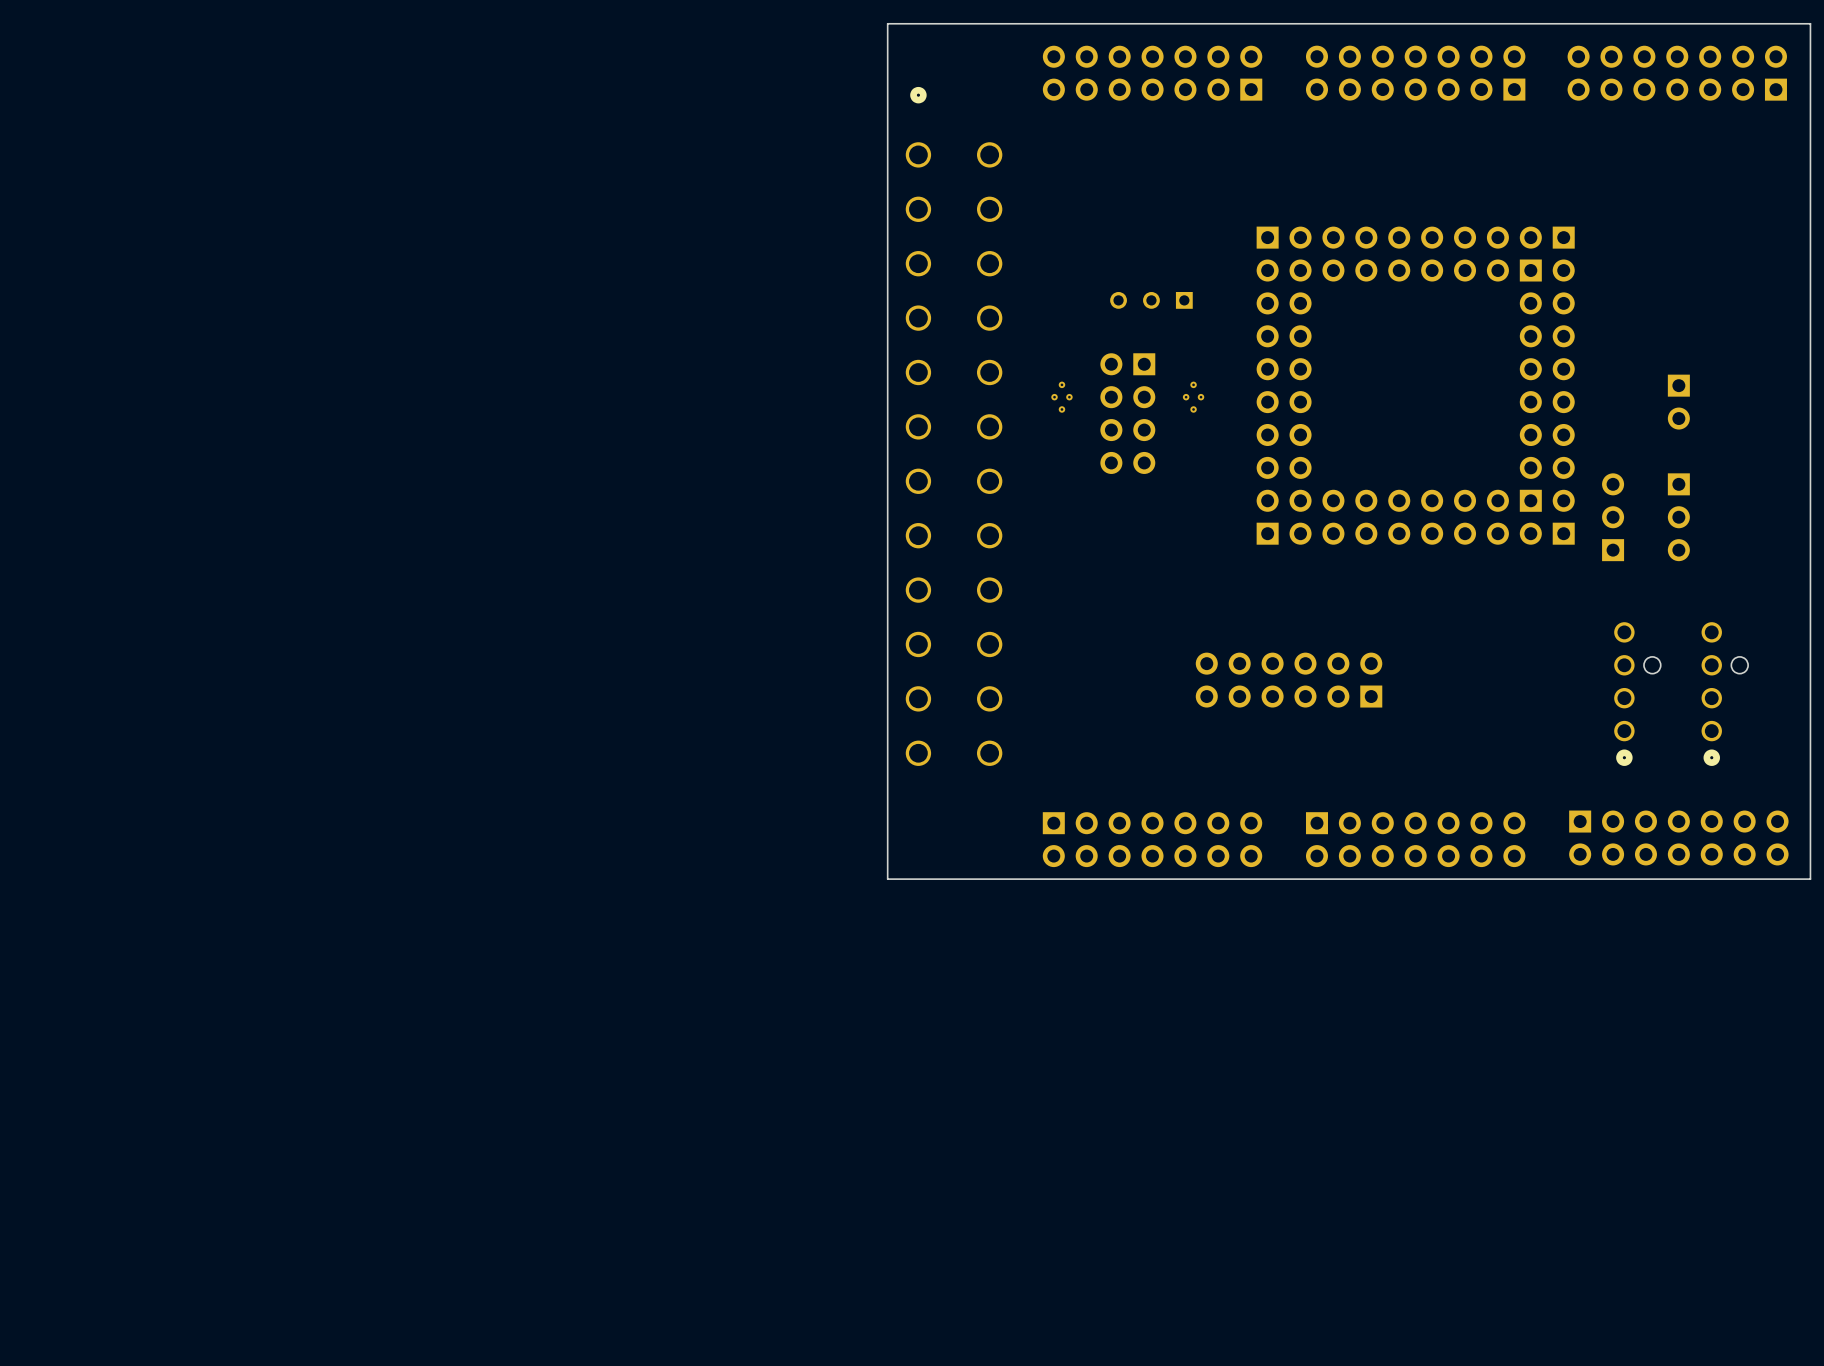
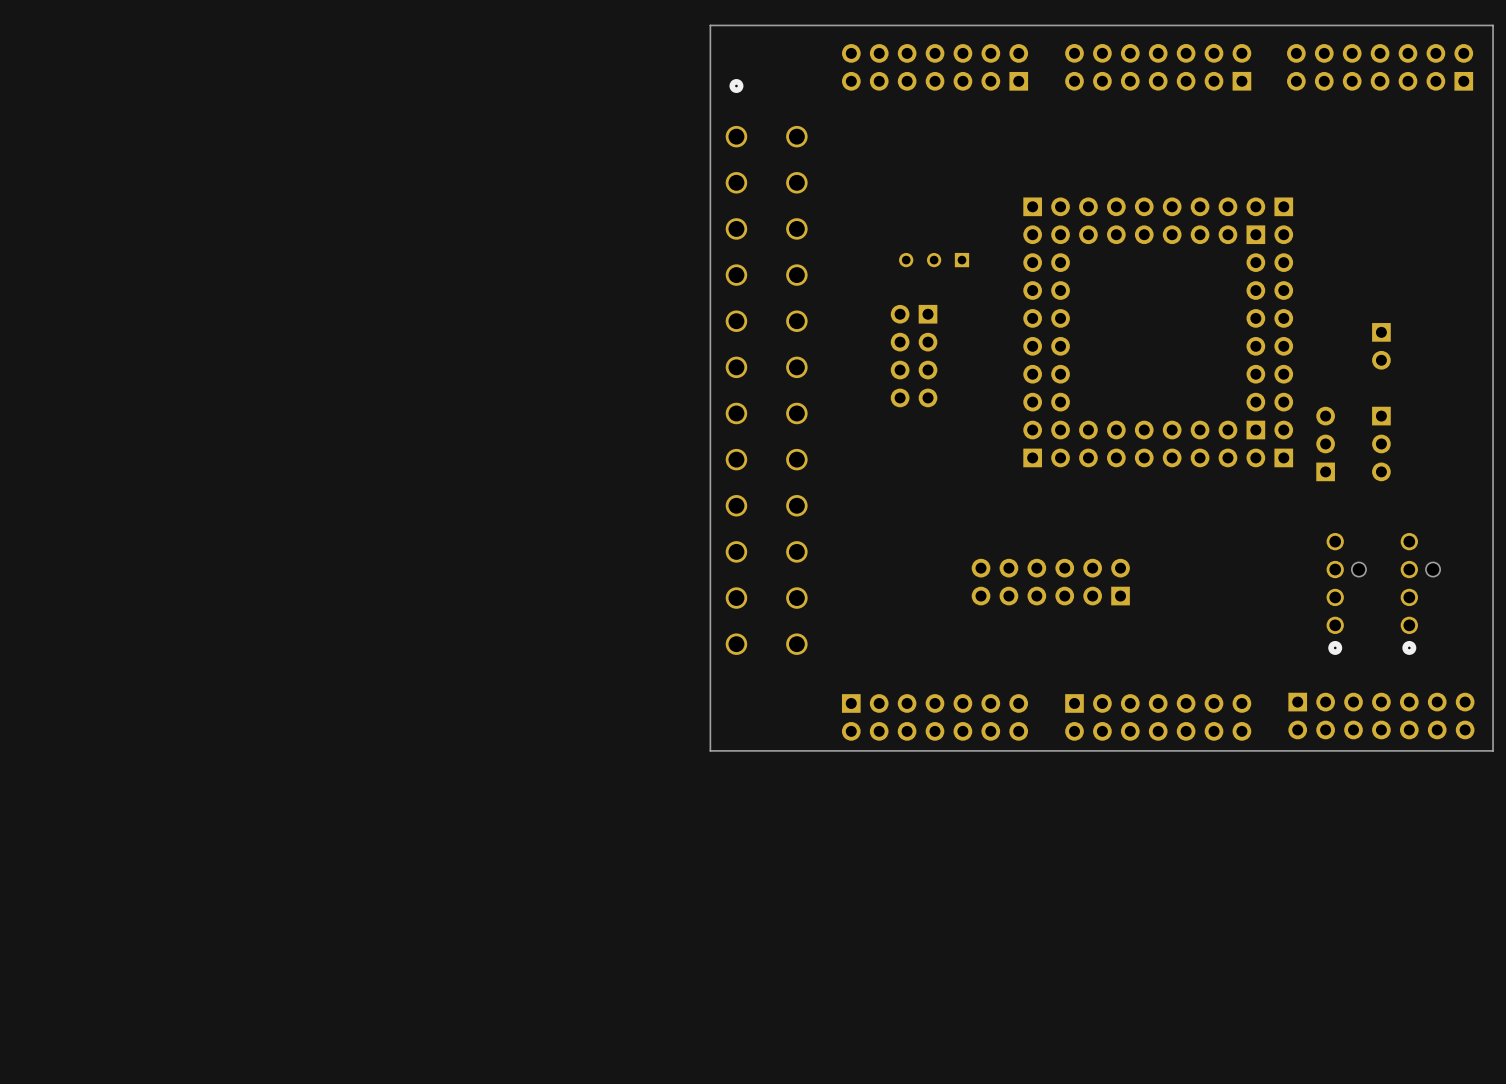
part: (1061, 397) -> none
part: (1193, 397) -> none

